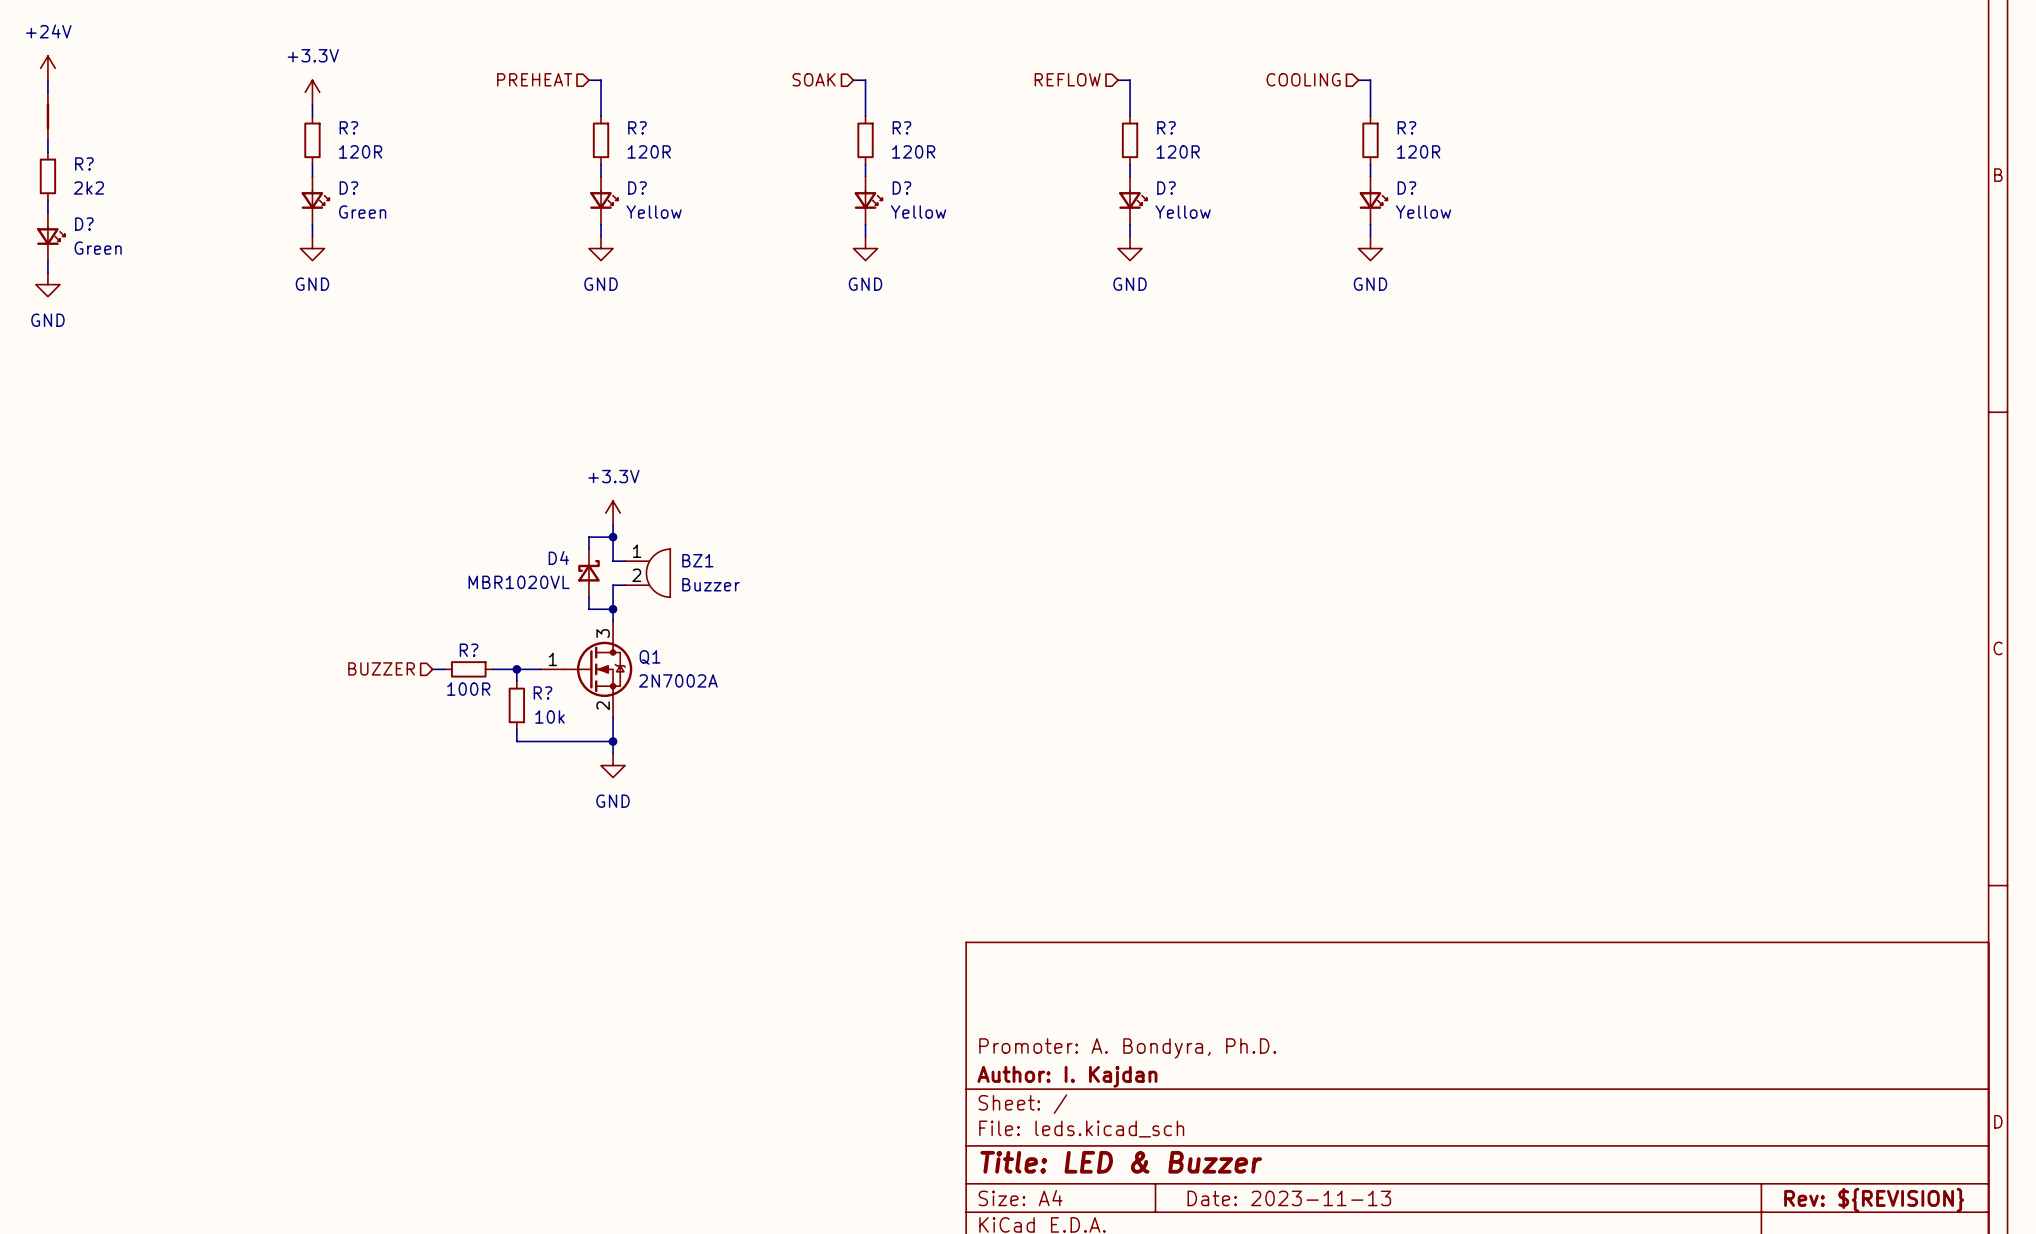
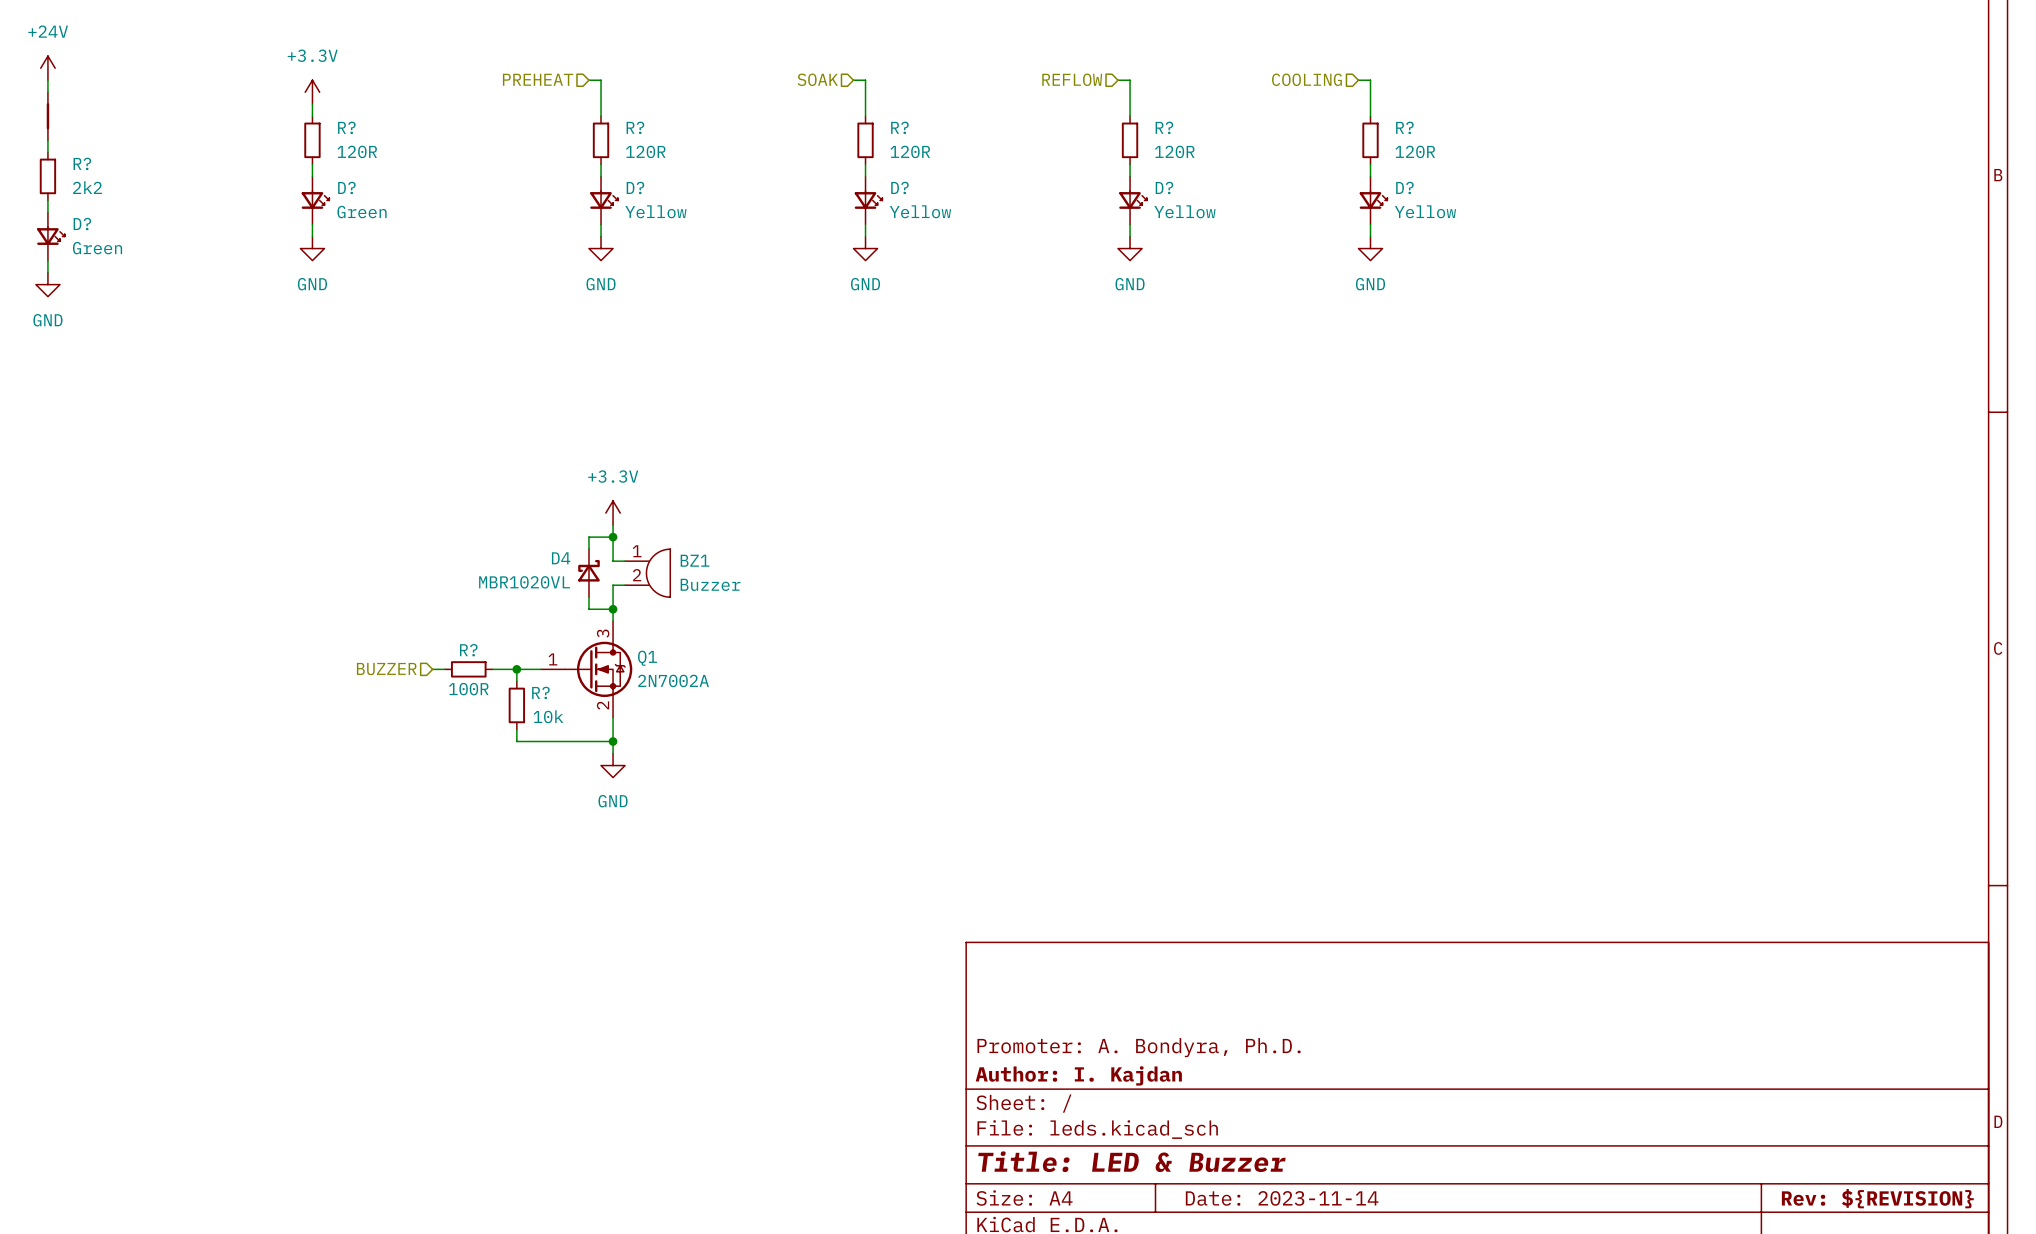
title block: Date: 2023-11-13 (1289, 1198) -> Date: 2023-11-14 (1282, 1198)

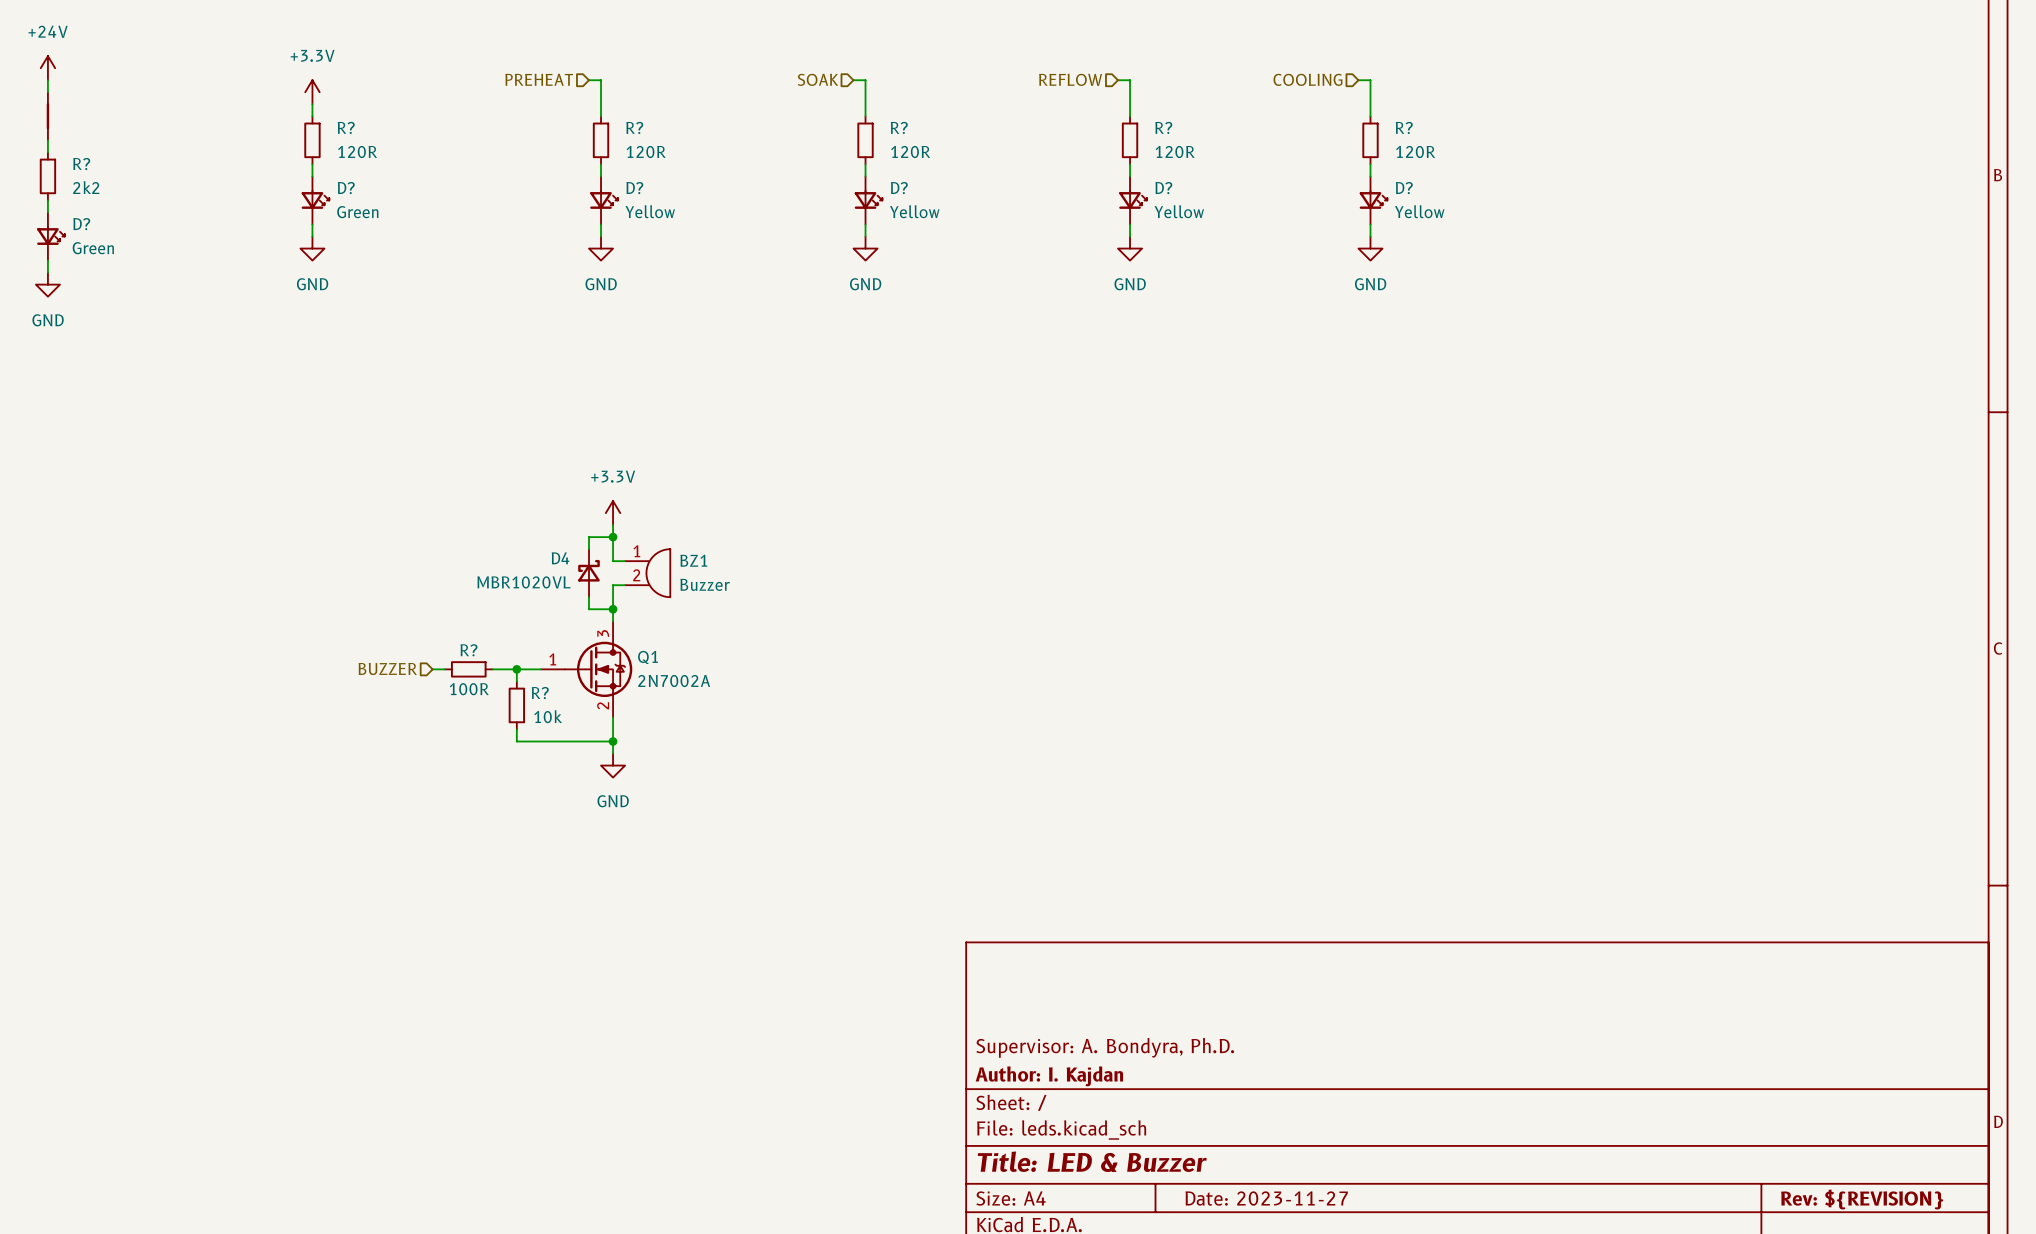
title block: Promoter: A. Bondyra, Ph.D. (1139, 1047) -> Supervisor: A. Bondyra, Ph.D. (1105, 1047)
title block: Date: 2023-11-14 (1282, 1198) -> Date: 2023-11-27 (1266, 1198)

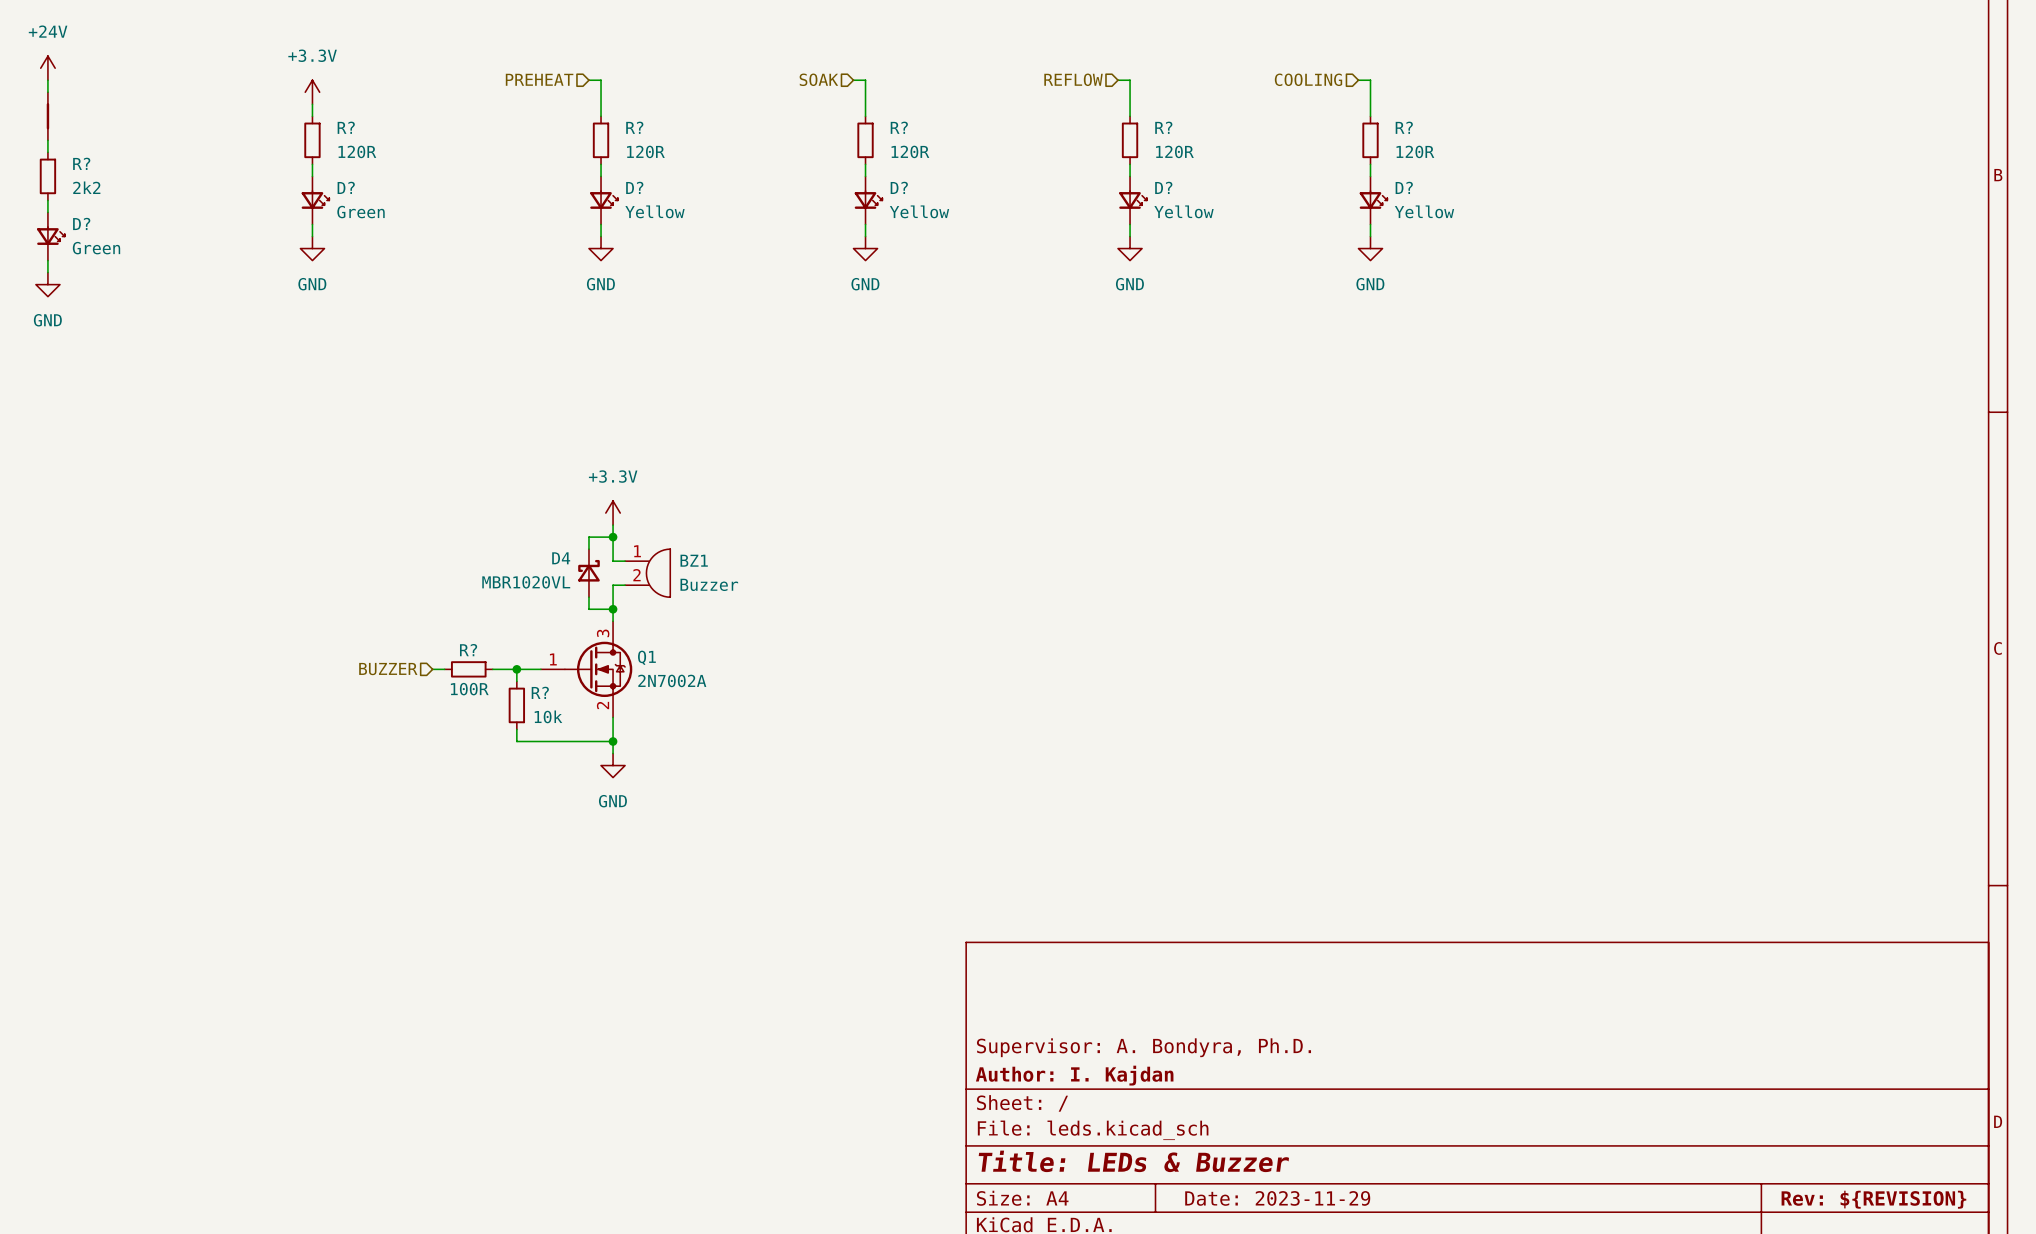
title block: Title: LED & Buzzer (1092, 1161) -> Title: LEDs & Buzzer (1133, 1161)
title block: Date: 2023-11-27 (1266, 1198) -> Date: 2023-11-29 (1277, 1198)

